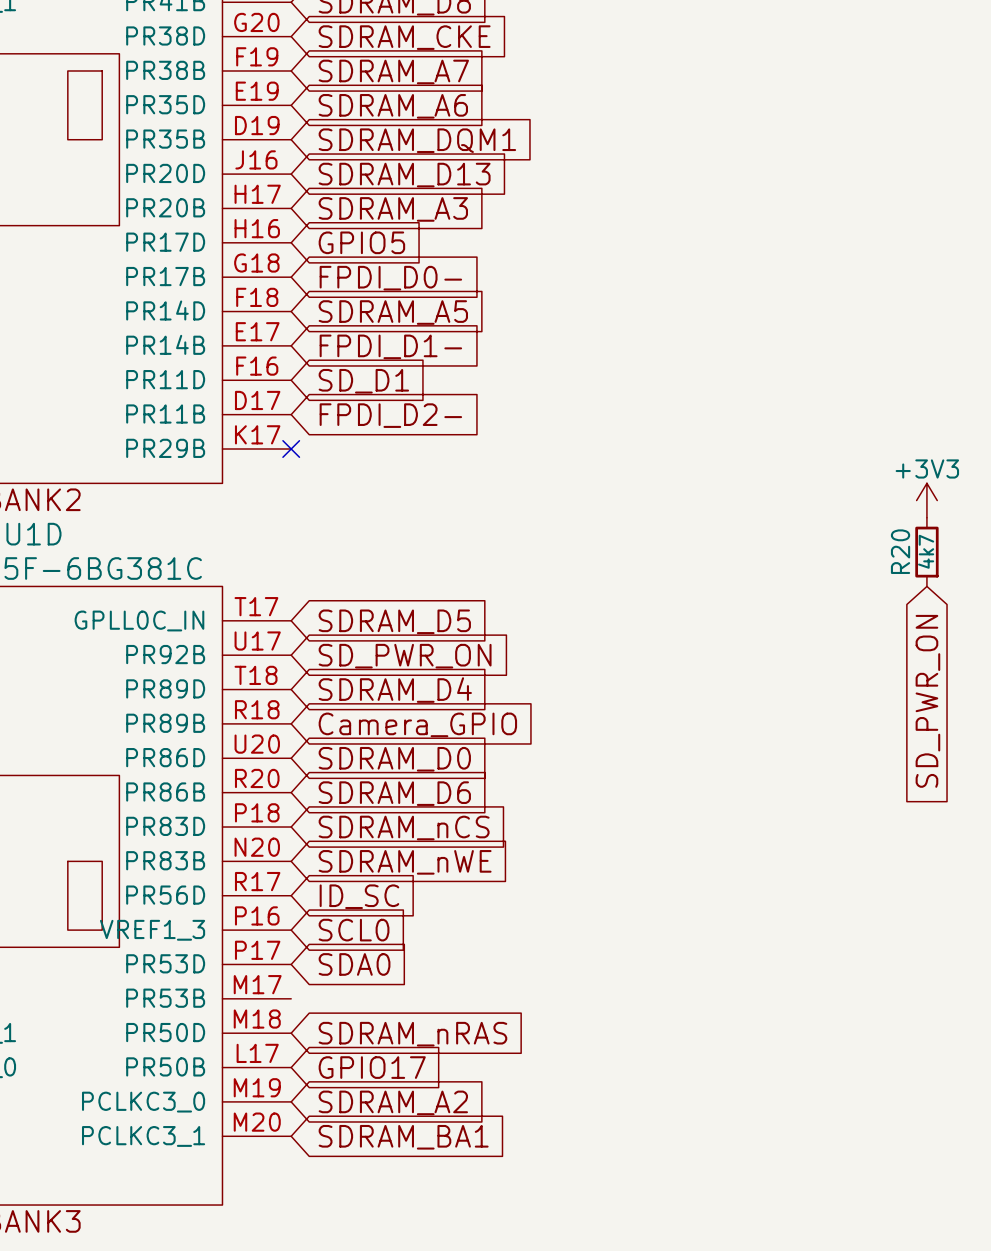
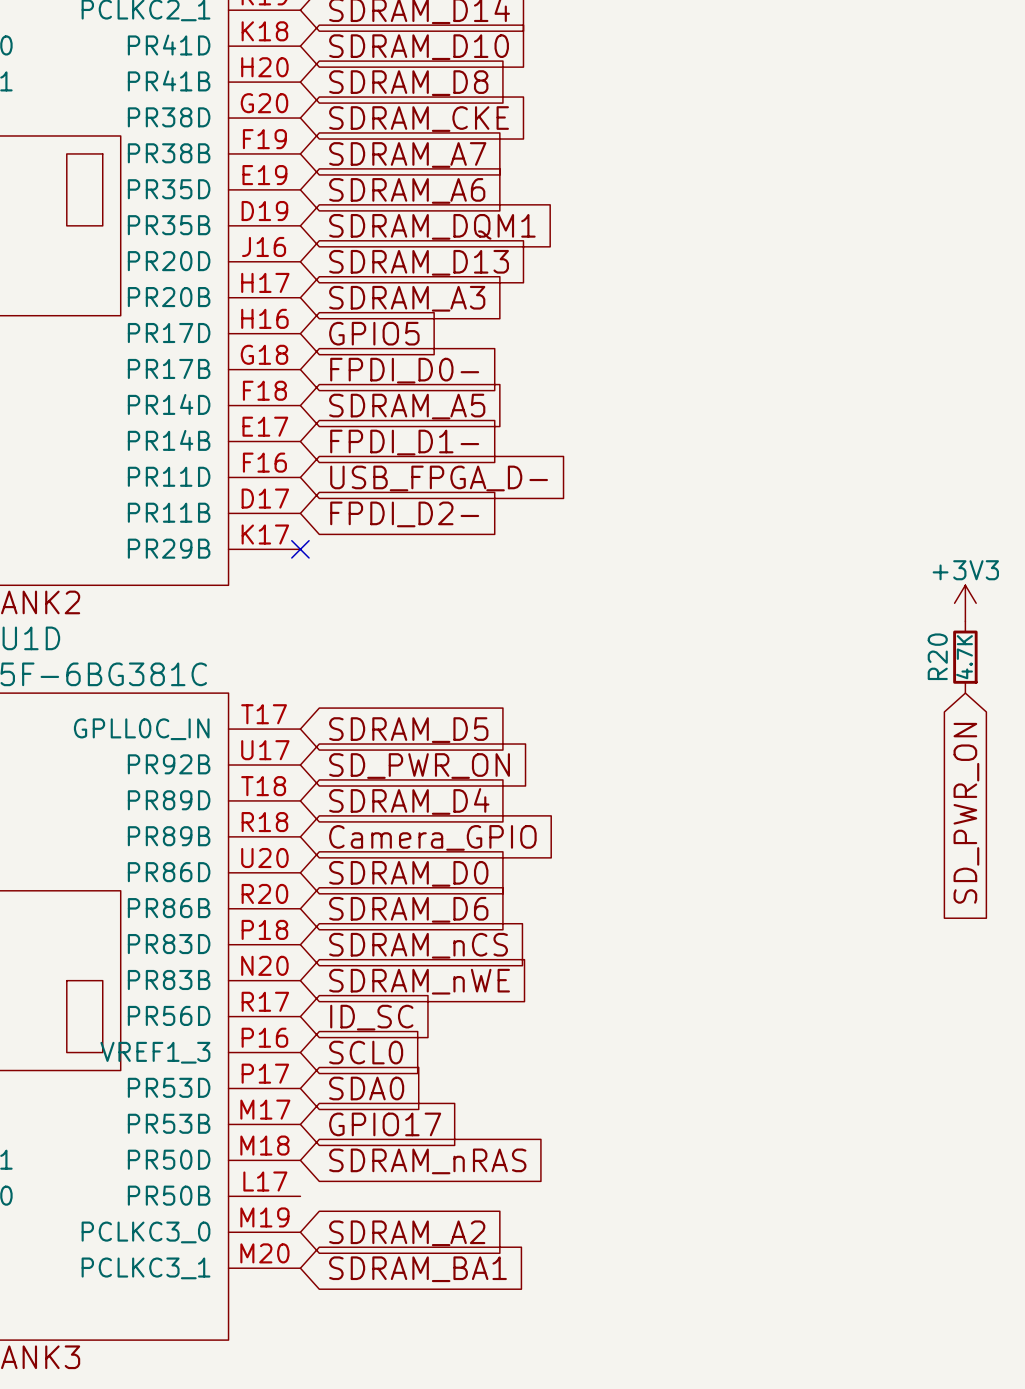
global label: SD_D1 (363, 381) -> USB_FPGA_D- (439, 478)
R20 value: 4k7 (926, 551) -> 4.7K (964, 657)
global label position: GPIO17 (372, 1067) -> GPIO17 (385, 1124)

